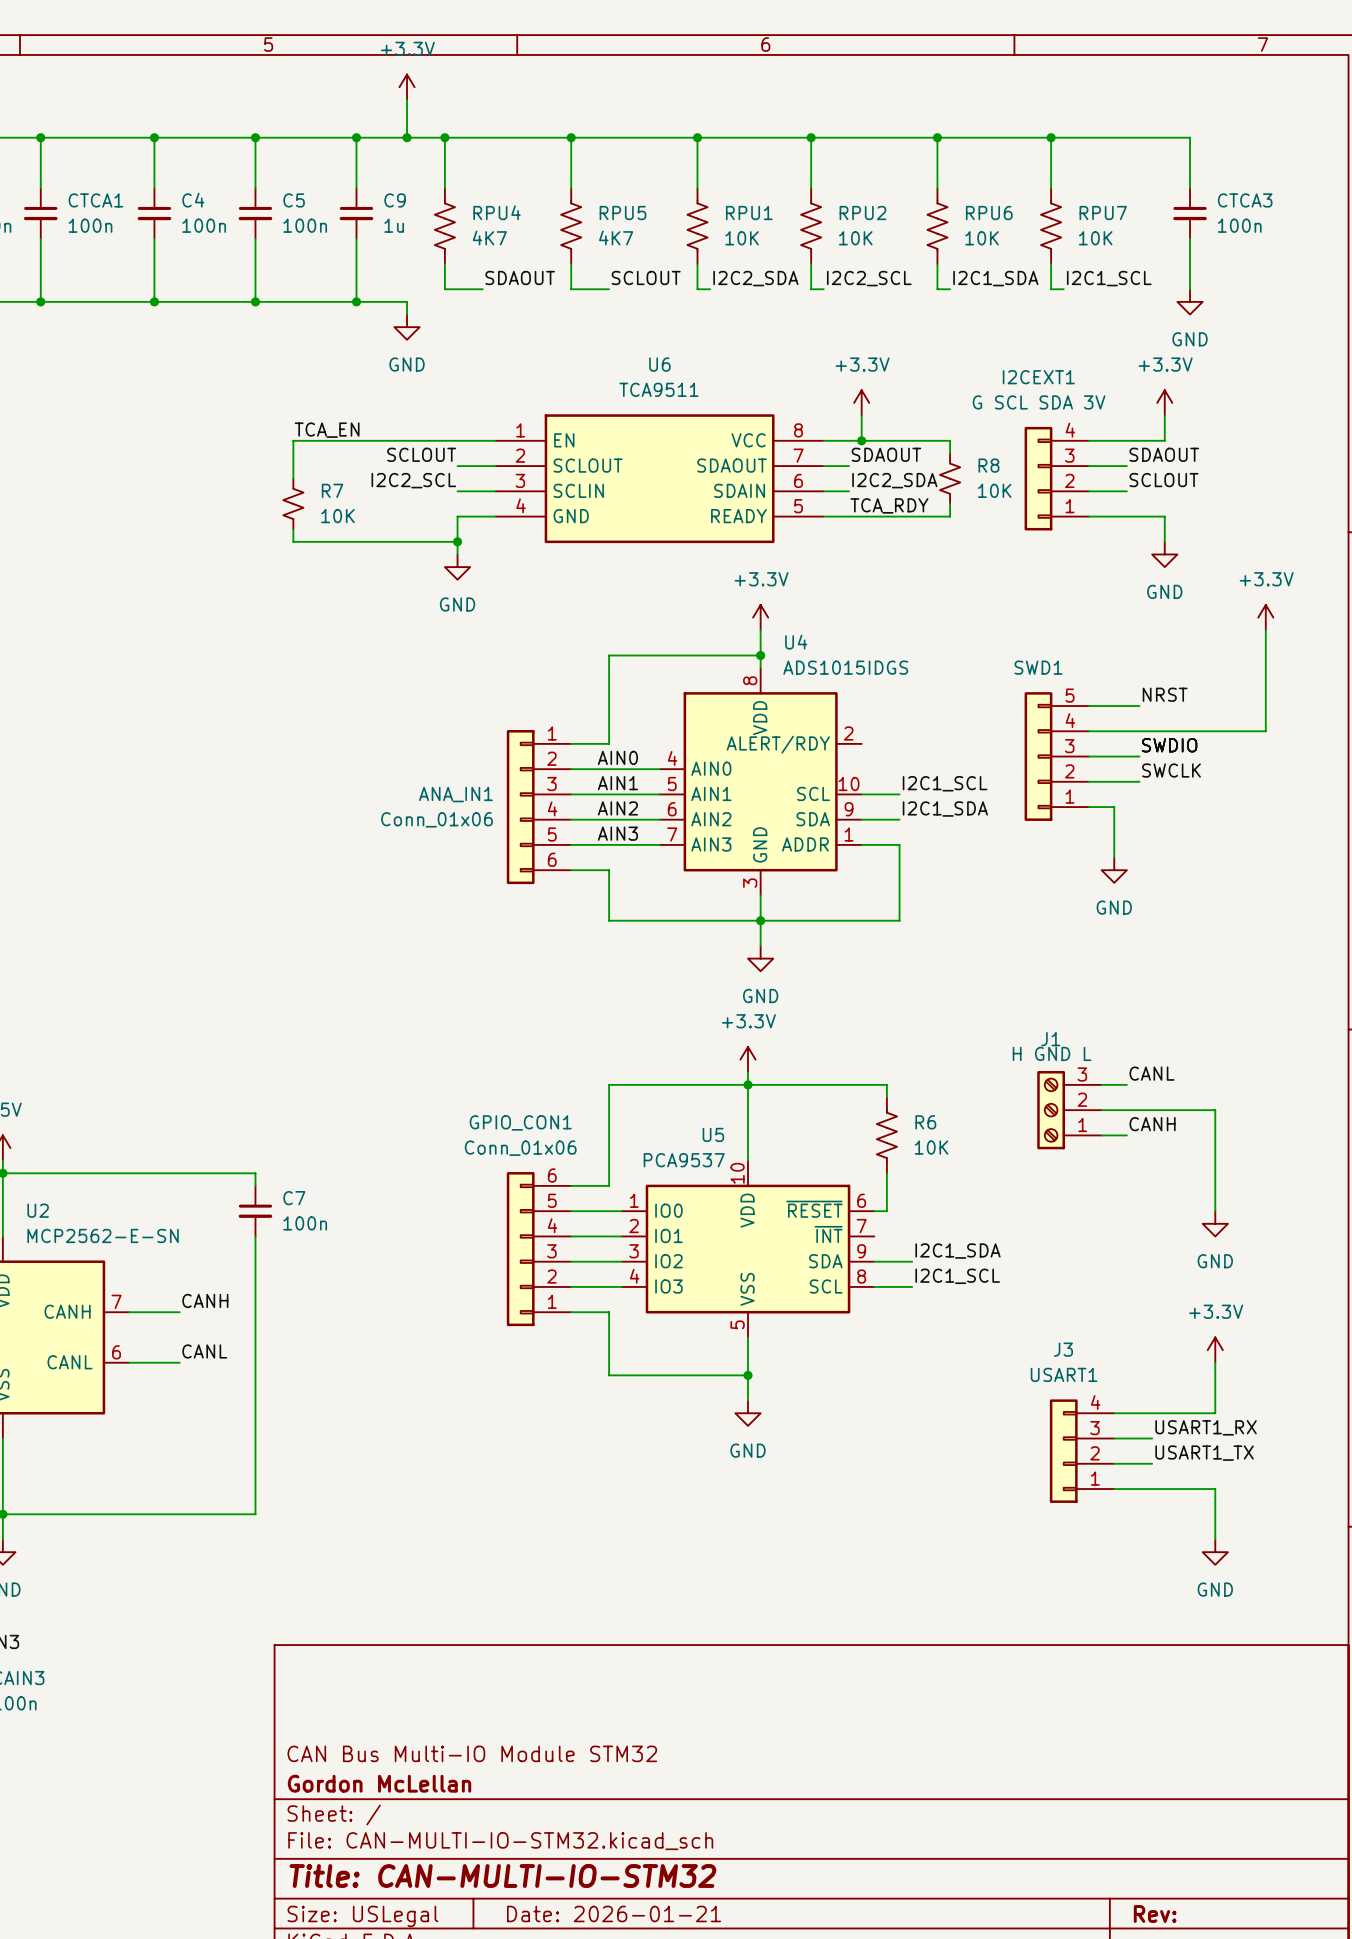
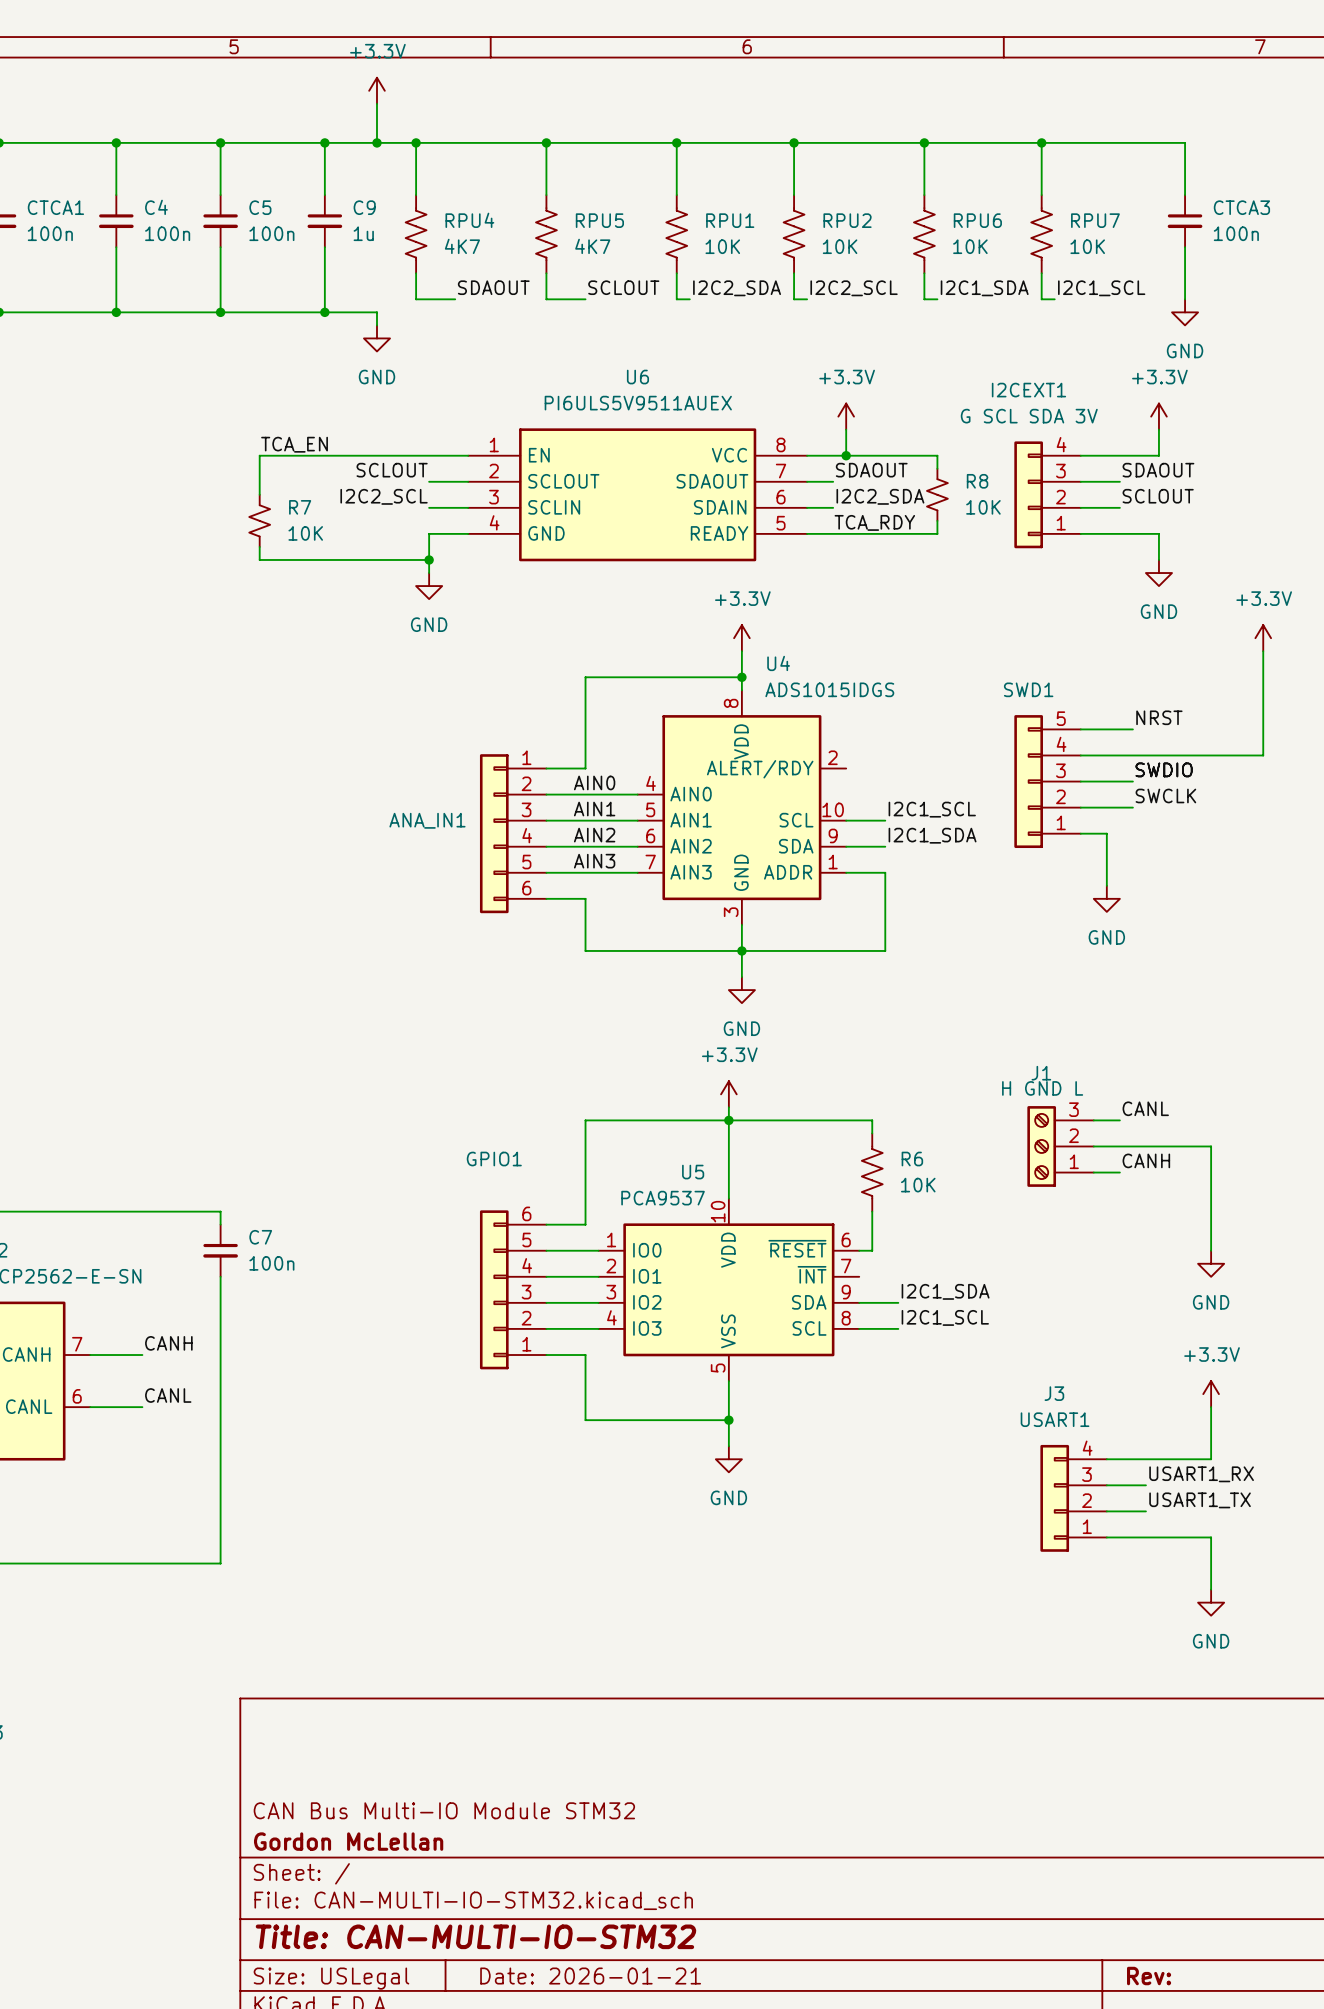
U6 value: TCA9511 (659, 389) -> PI6ULS5V9511AUEX (638, 403)
ANA_IN1 value: Conn_01x06 (437, 819) -> none
GPIO_CON1 name: GPIO_CON1 (520, 1122) -> GPIO1 (494, 1159)
GPIO_CON1 value: Conn_01x06 (520, 1148) -> none

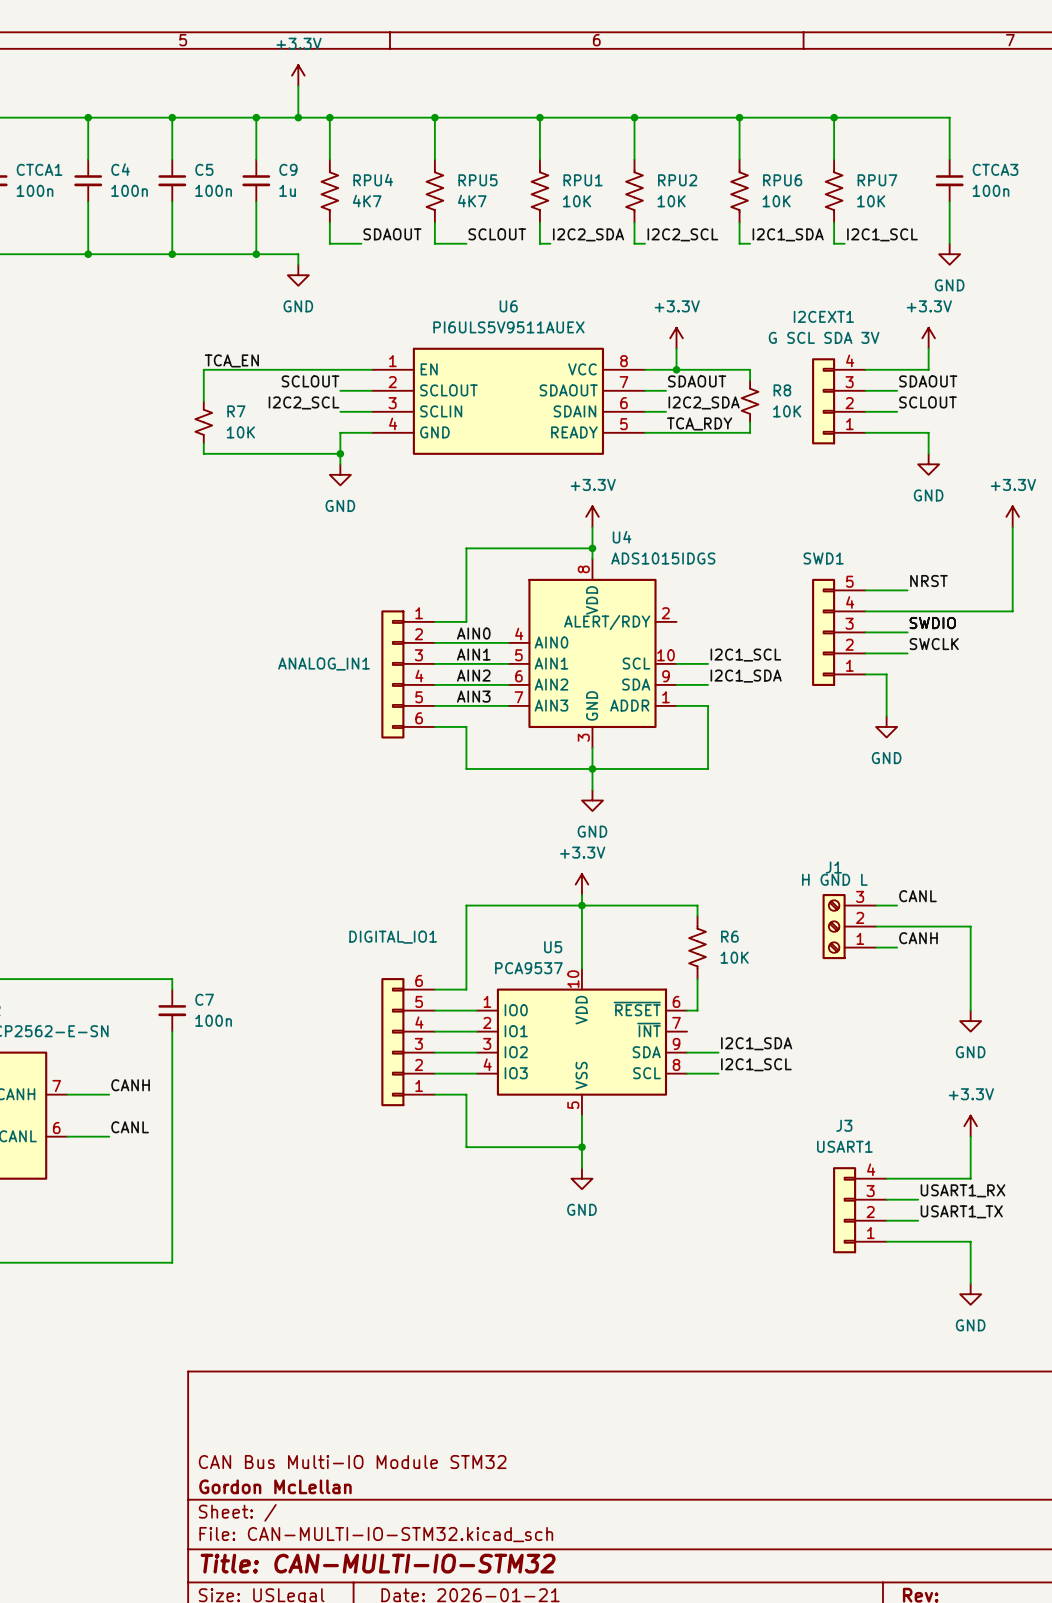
ANA_IN1 name: ANA_IN1 (427, 820) -> ANALOG_IN1 (324, 664)
GPIO1 name: GPIO1 (494, 1159) -> DIGITAL_IO1 (393, 937)

